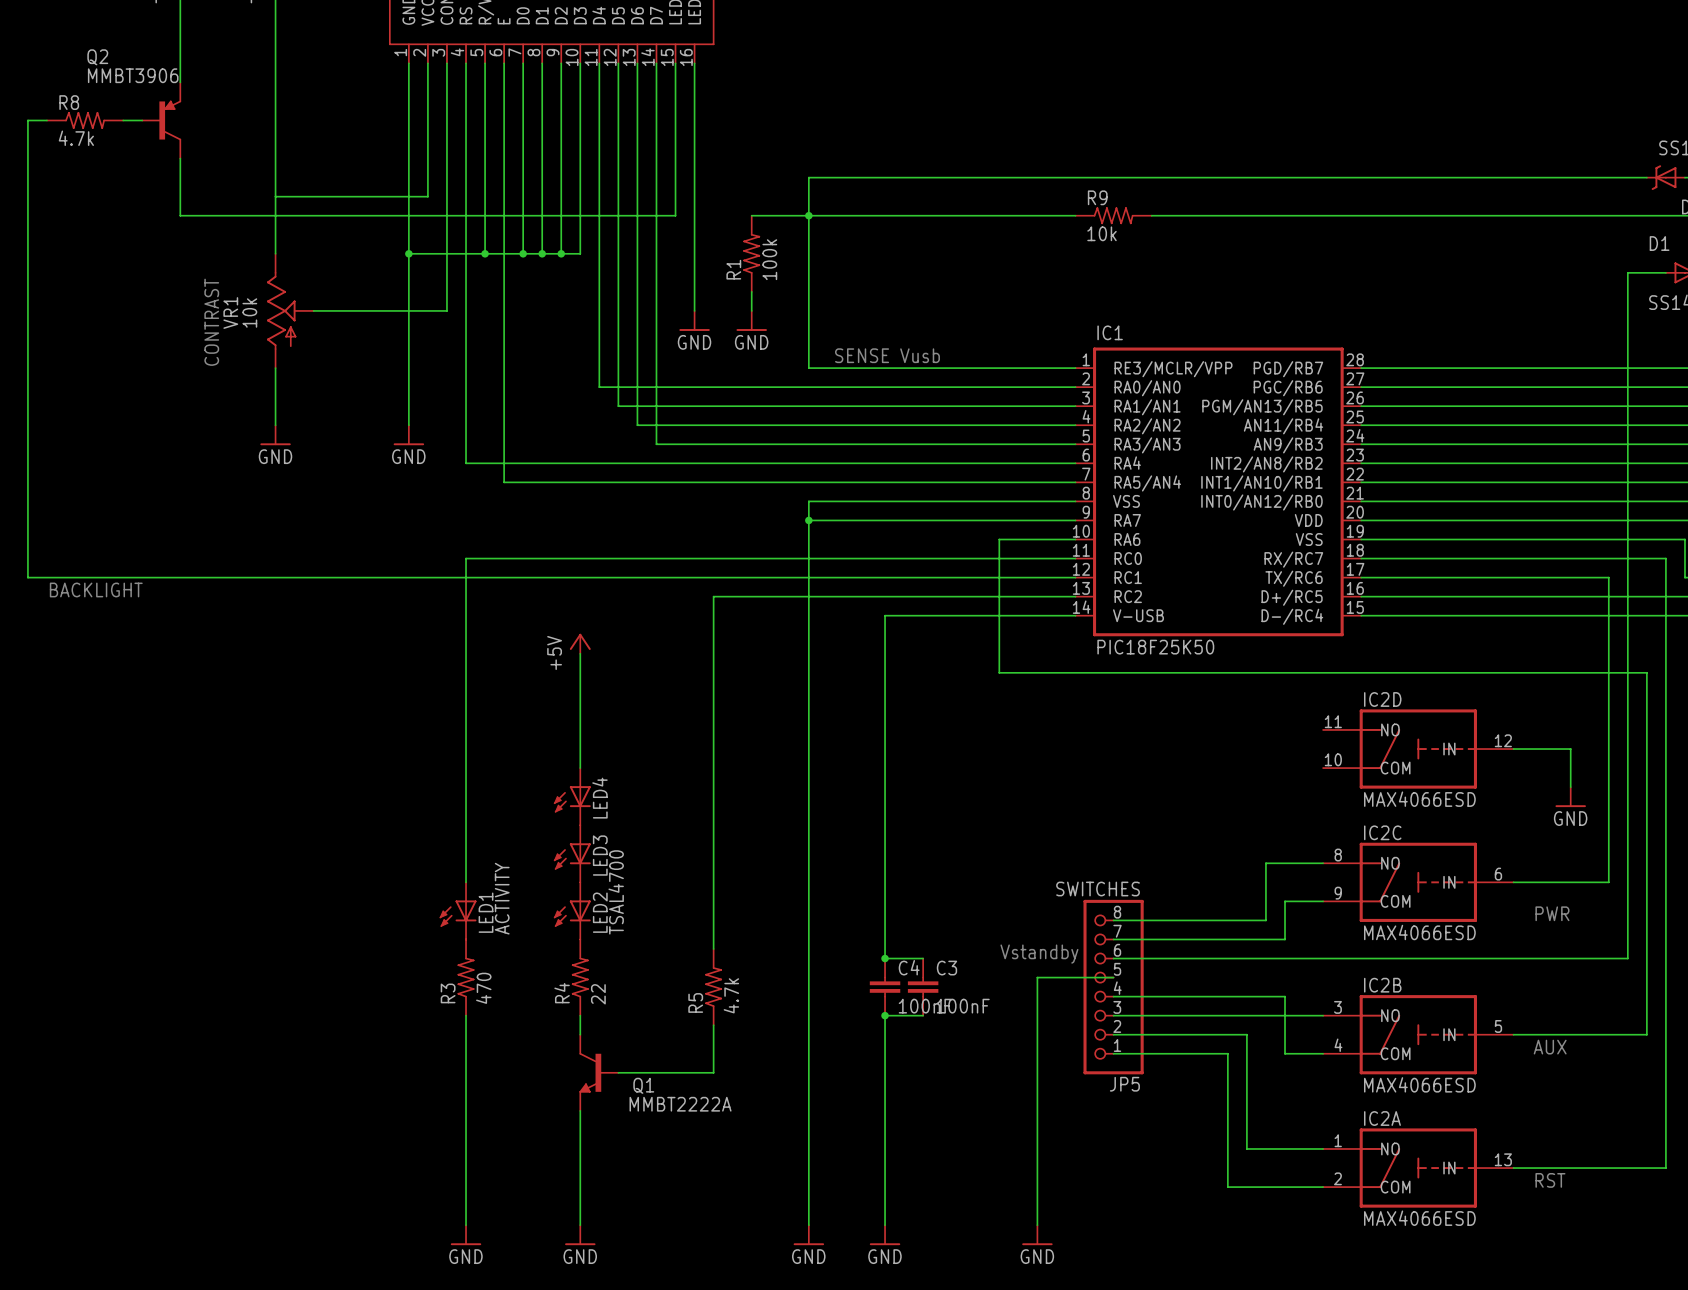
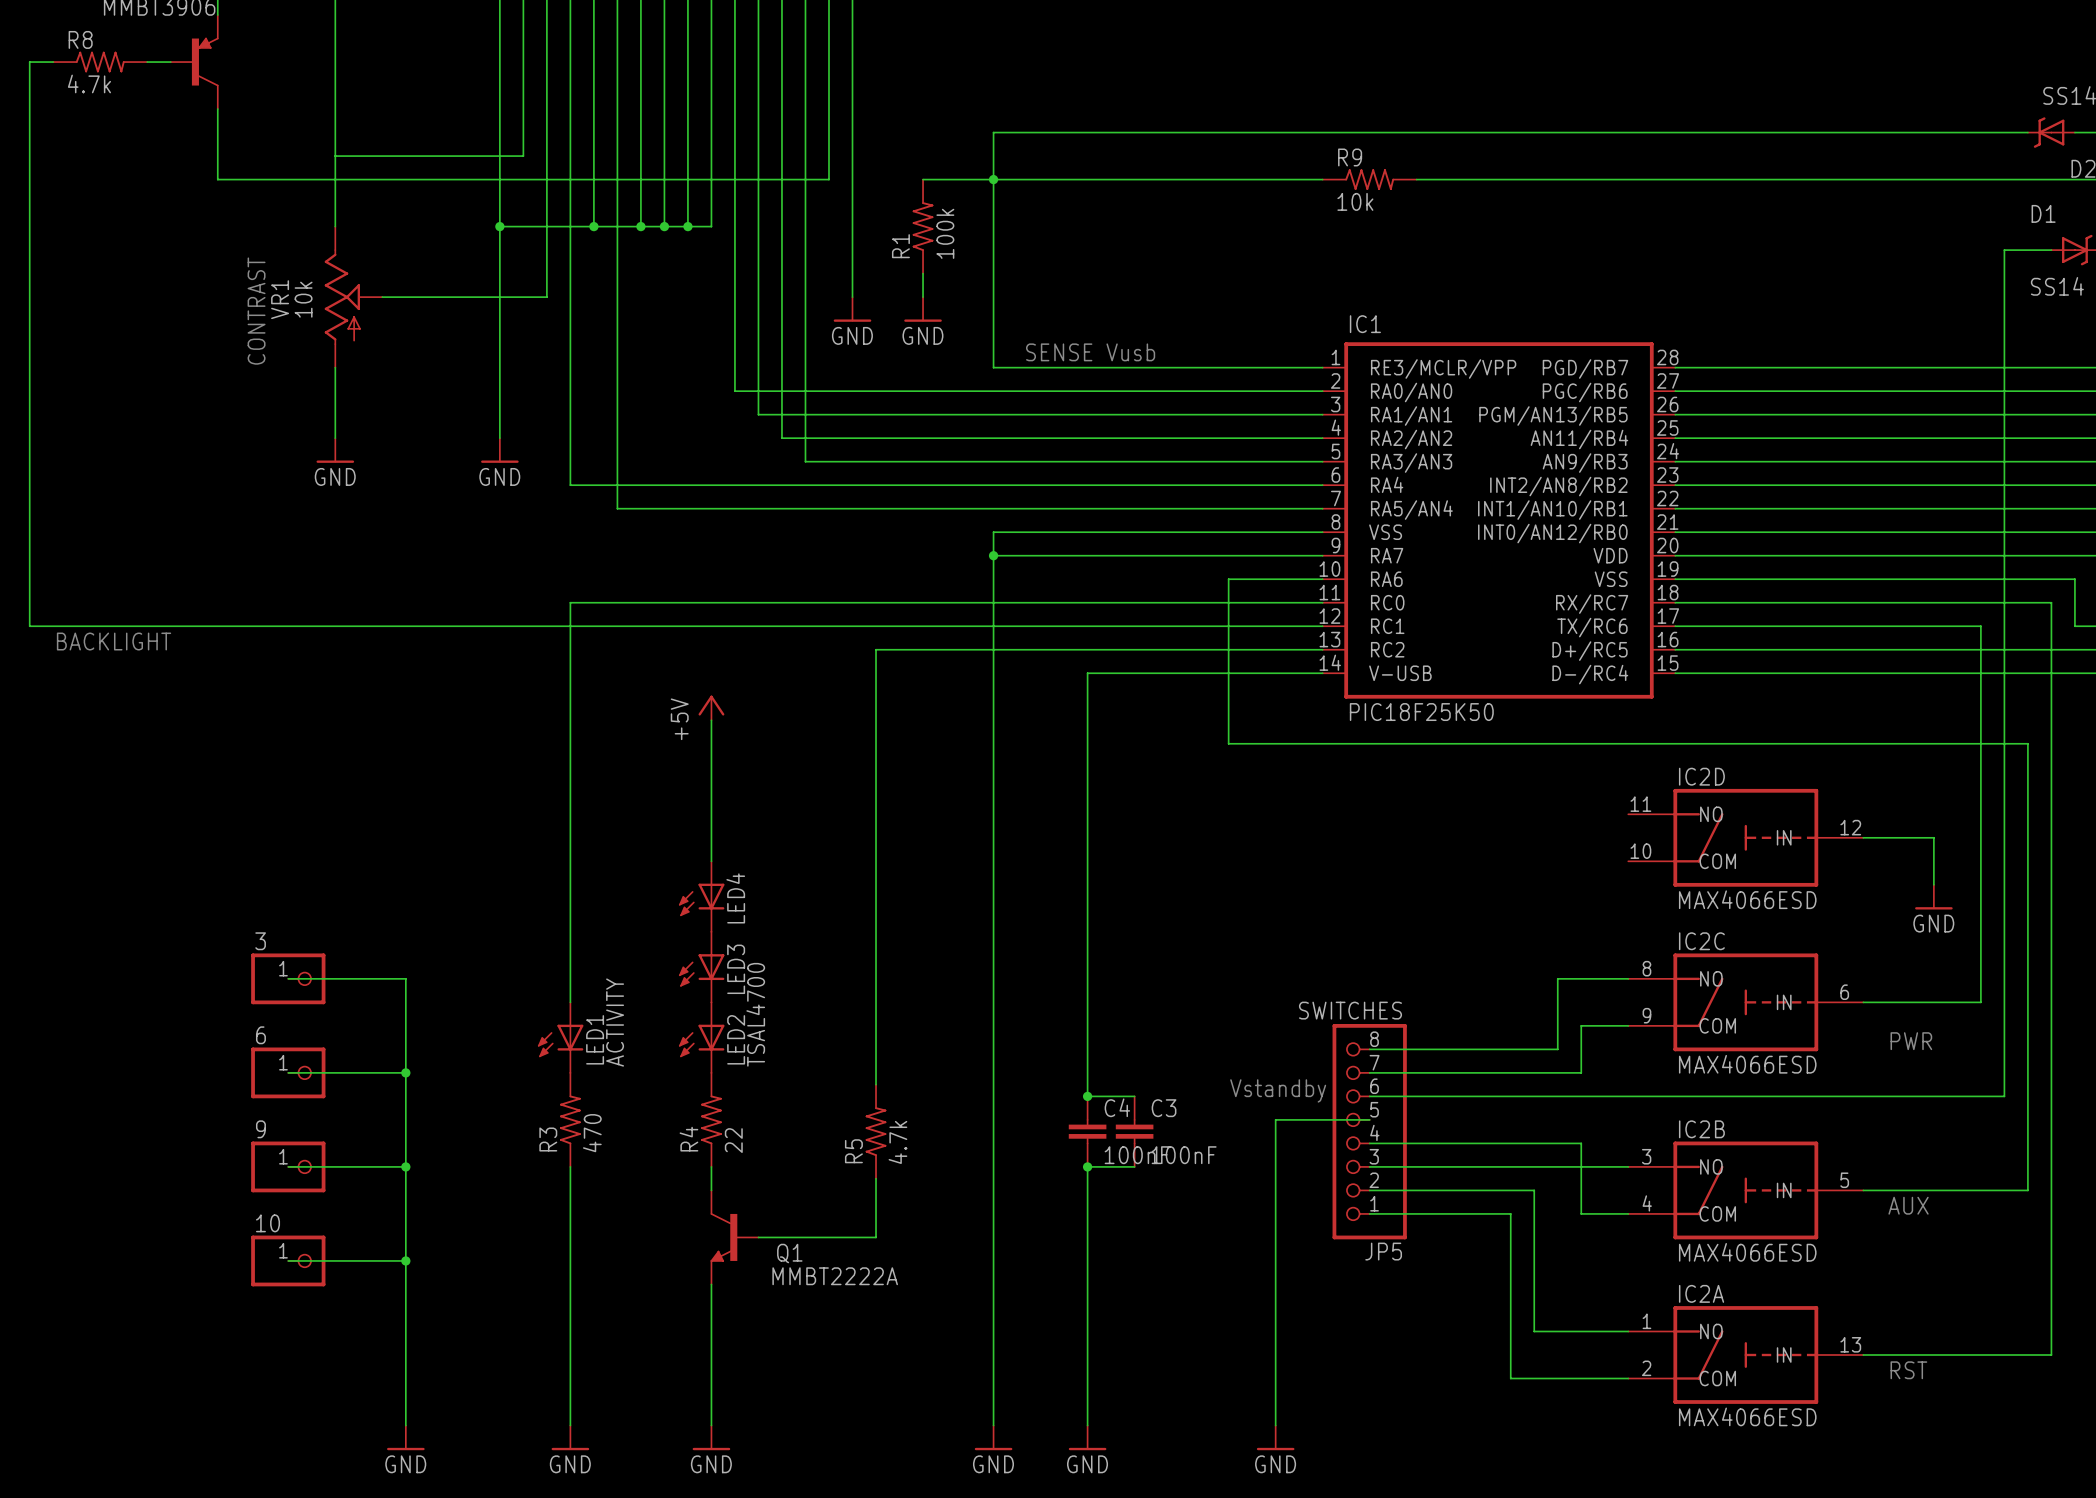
wire: none -> (288, 978) (405, 978) (405, 1425)
3: none -> (288, 978)
wire: none -> (288, 1072) (405, 1072)
6: none -> (288, 1072)
junction: none -> (405, 1072)
wire: none -> (288, 1166) (405, 1166)
9: none -> (288, 1166)
junction: none -> (405, 1166)
wire: none -> (288, 1260) (405, 1260)
10: none -> (288, 1260)
junction: none -> (405, 1260)
power symbol: none -> GND (405, 1437)

